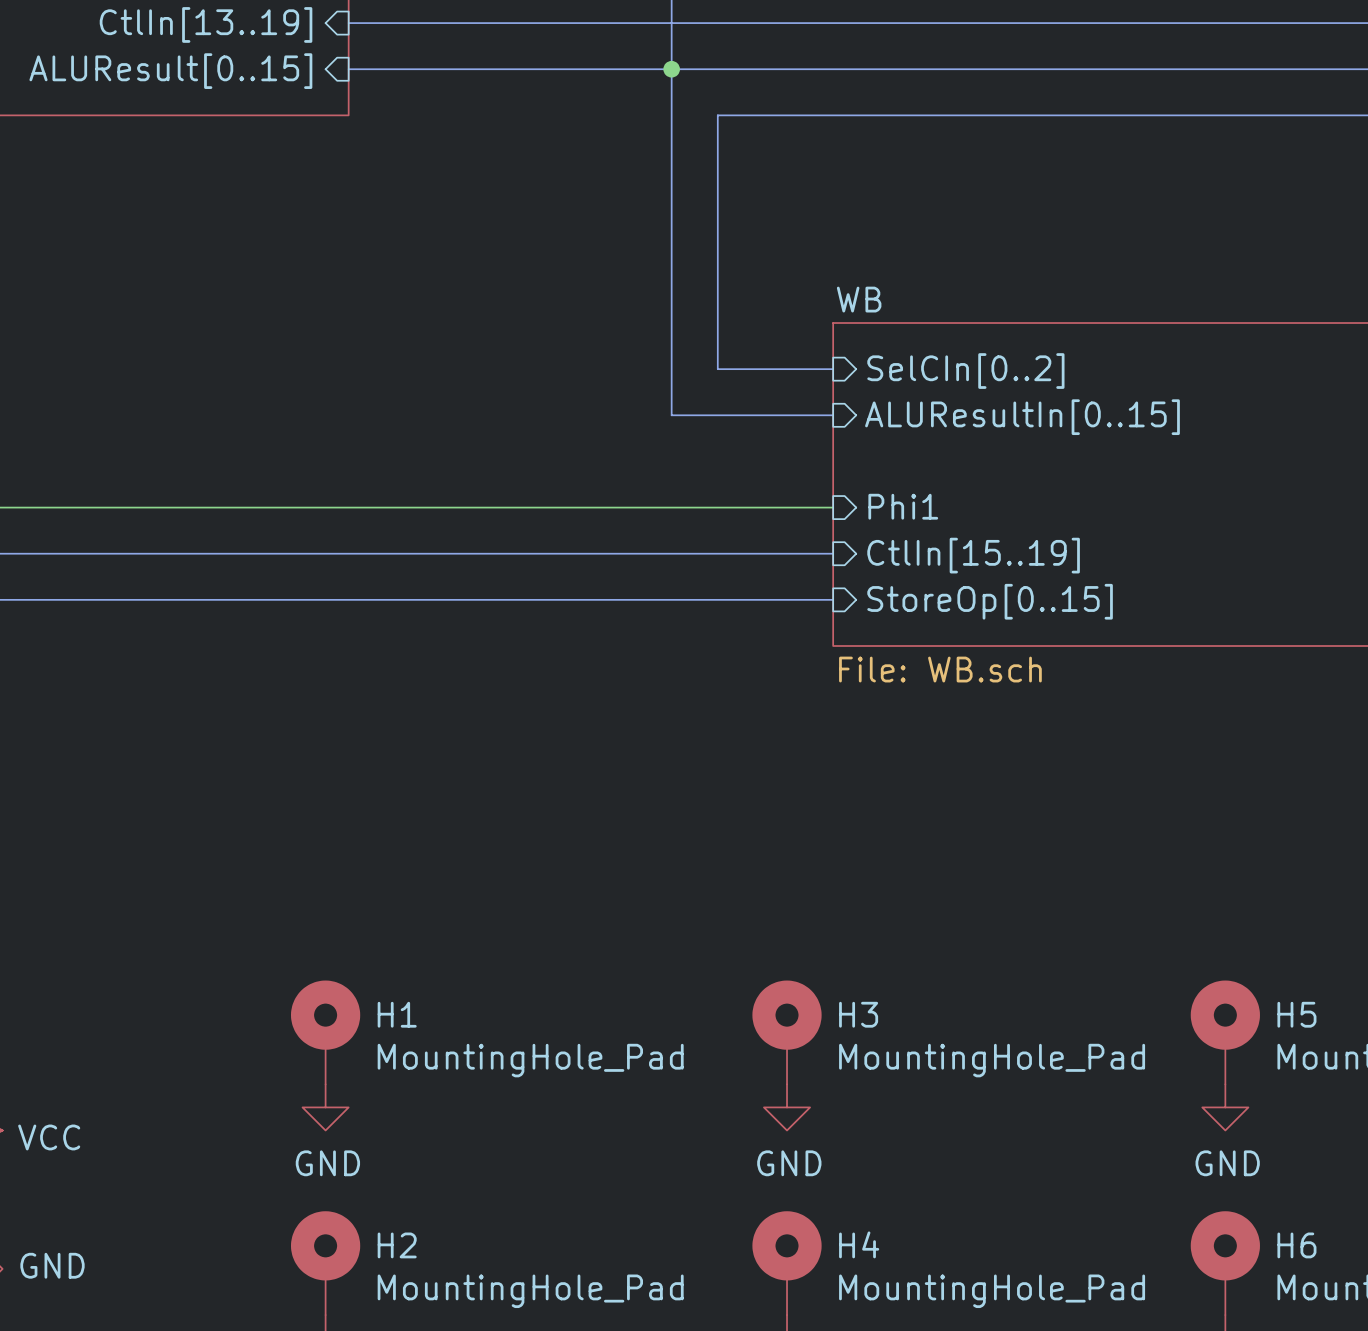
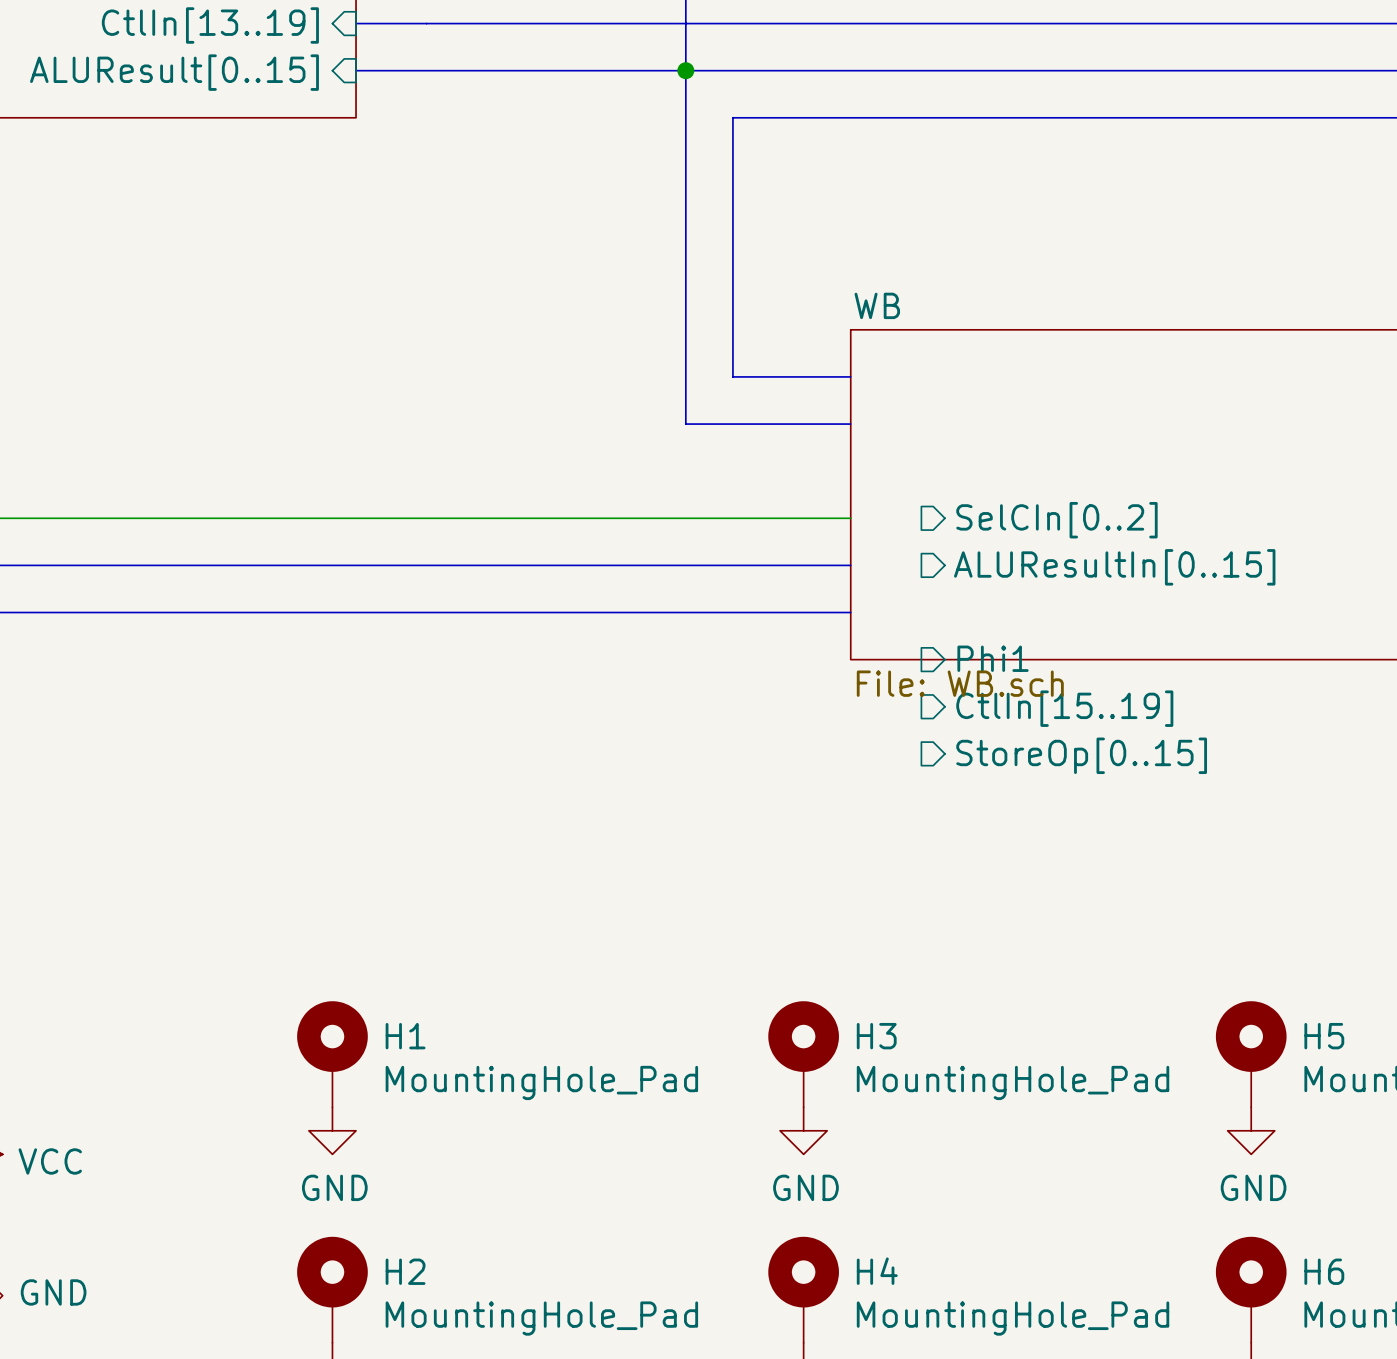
sheet pin position: SelCIn[0..2] (965, 371) -> SelCIn[0..2] (1056, 520)
sheet pin position: ALUResultIn[0..15] (1022, 417) -> ALUResultIn[0..15] (1114, 567)
sheet pin position: Phi1 (903, 506) -> Phi1 (993, 658)
sheet pin position: CtlIn[15..19] (973, 555) -> CtlIn[15..19] (1064, 708)
sheet pin position: StoreOp[0..15] (990, 601) -> StoreOp[0..15] (1081, 755)

